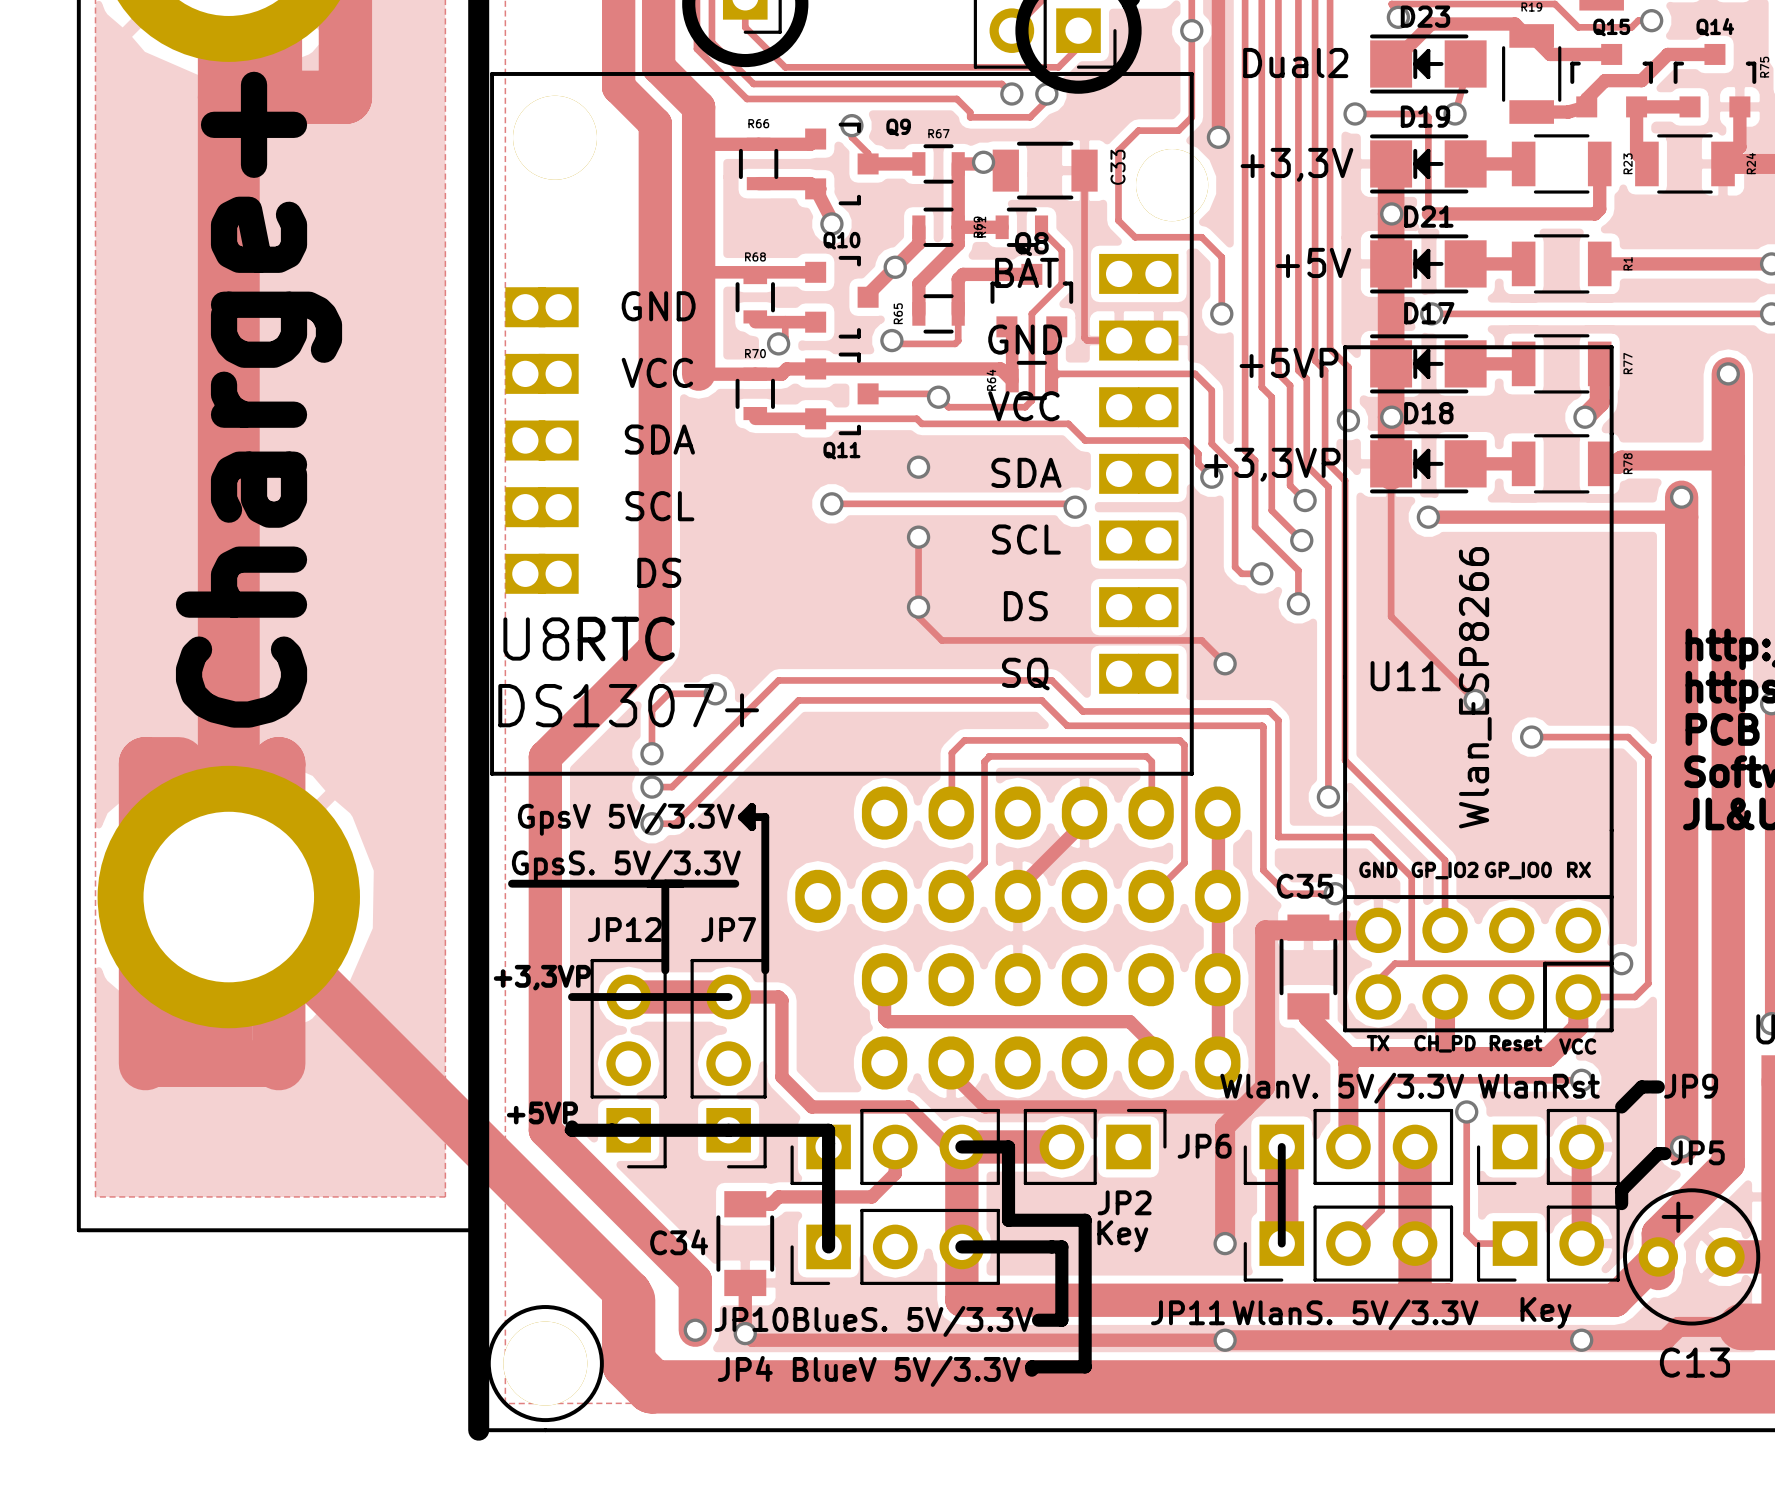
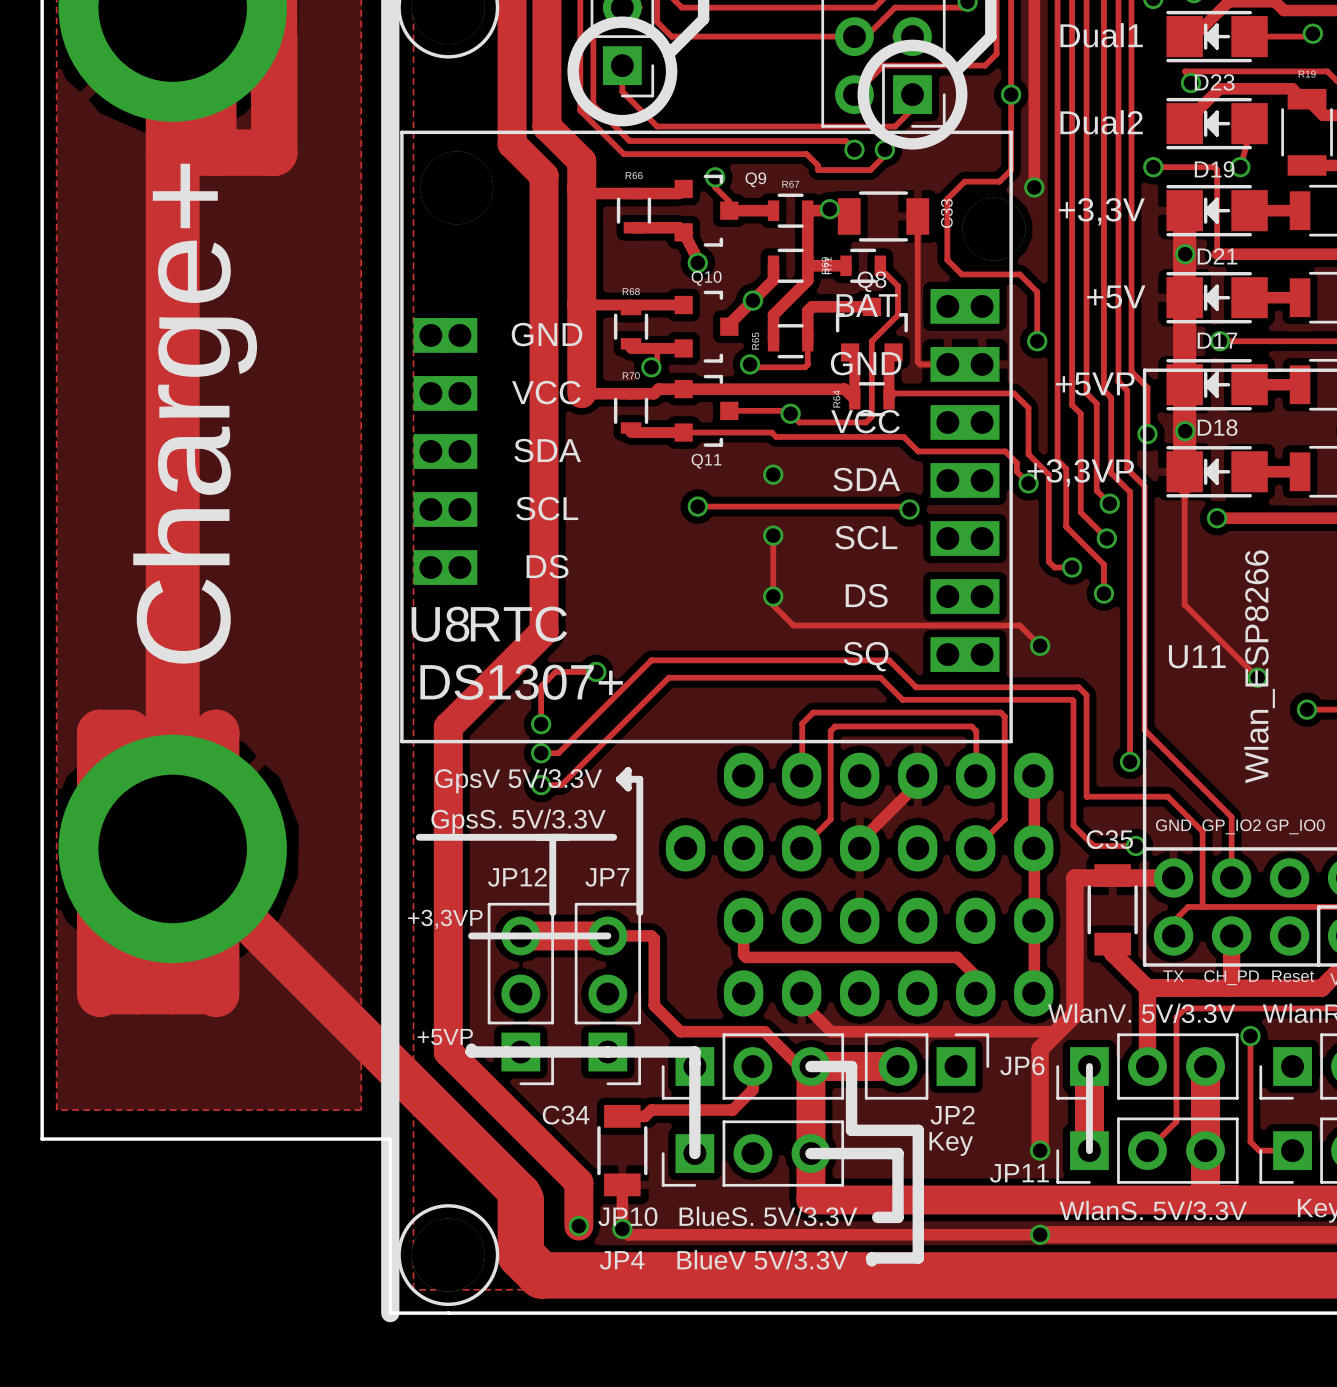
C34 name position: C34 (679, 1242) -> C34 (566, 1115)
JP11 name position: JP11 (1187, 1312) -> JP11 (1019, 1173)

